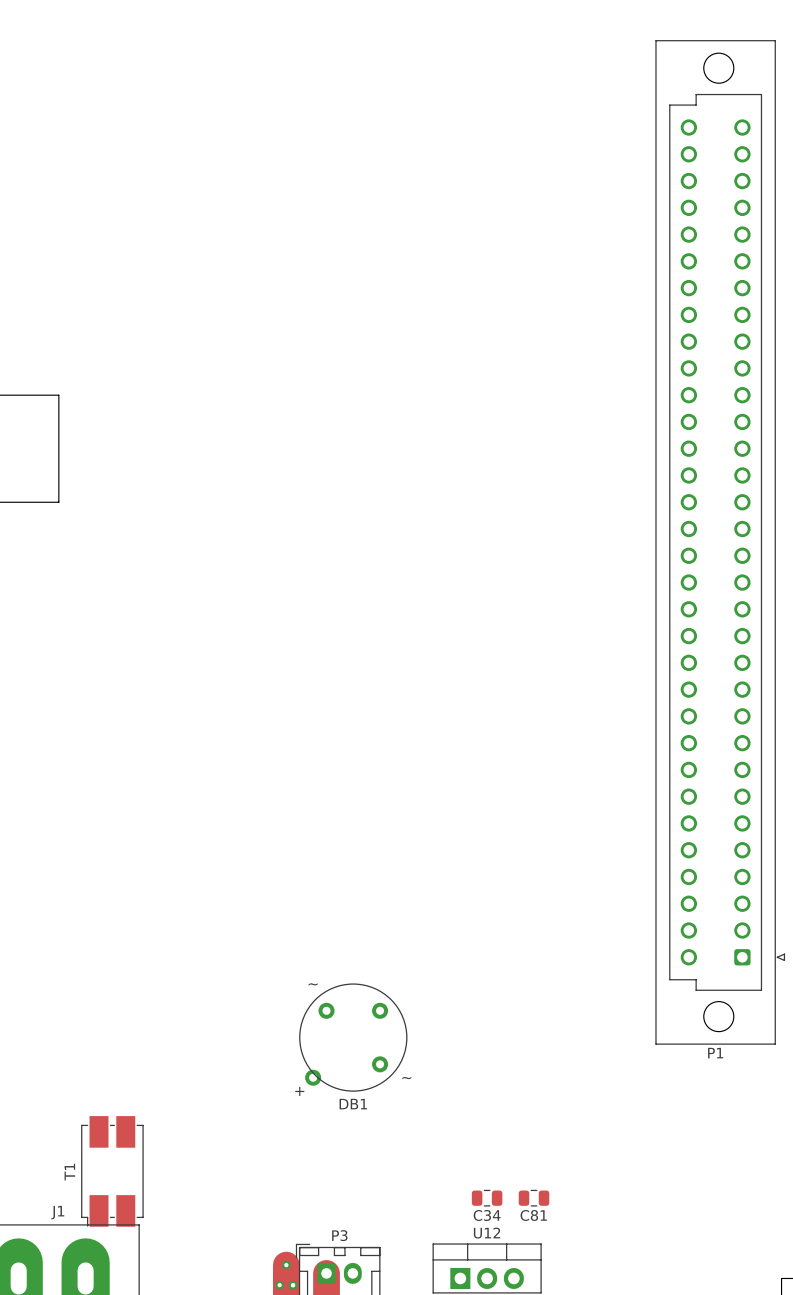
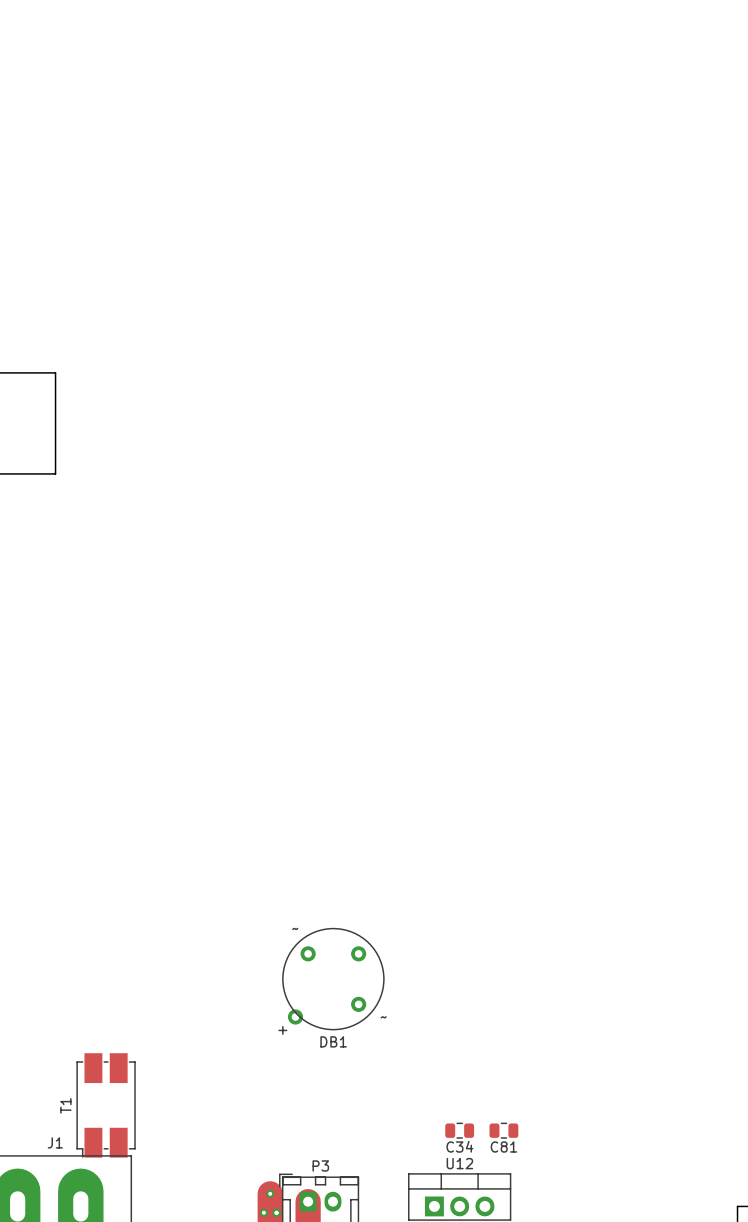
P1: (720, 542) -> none

